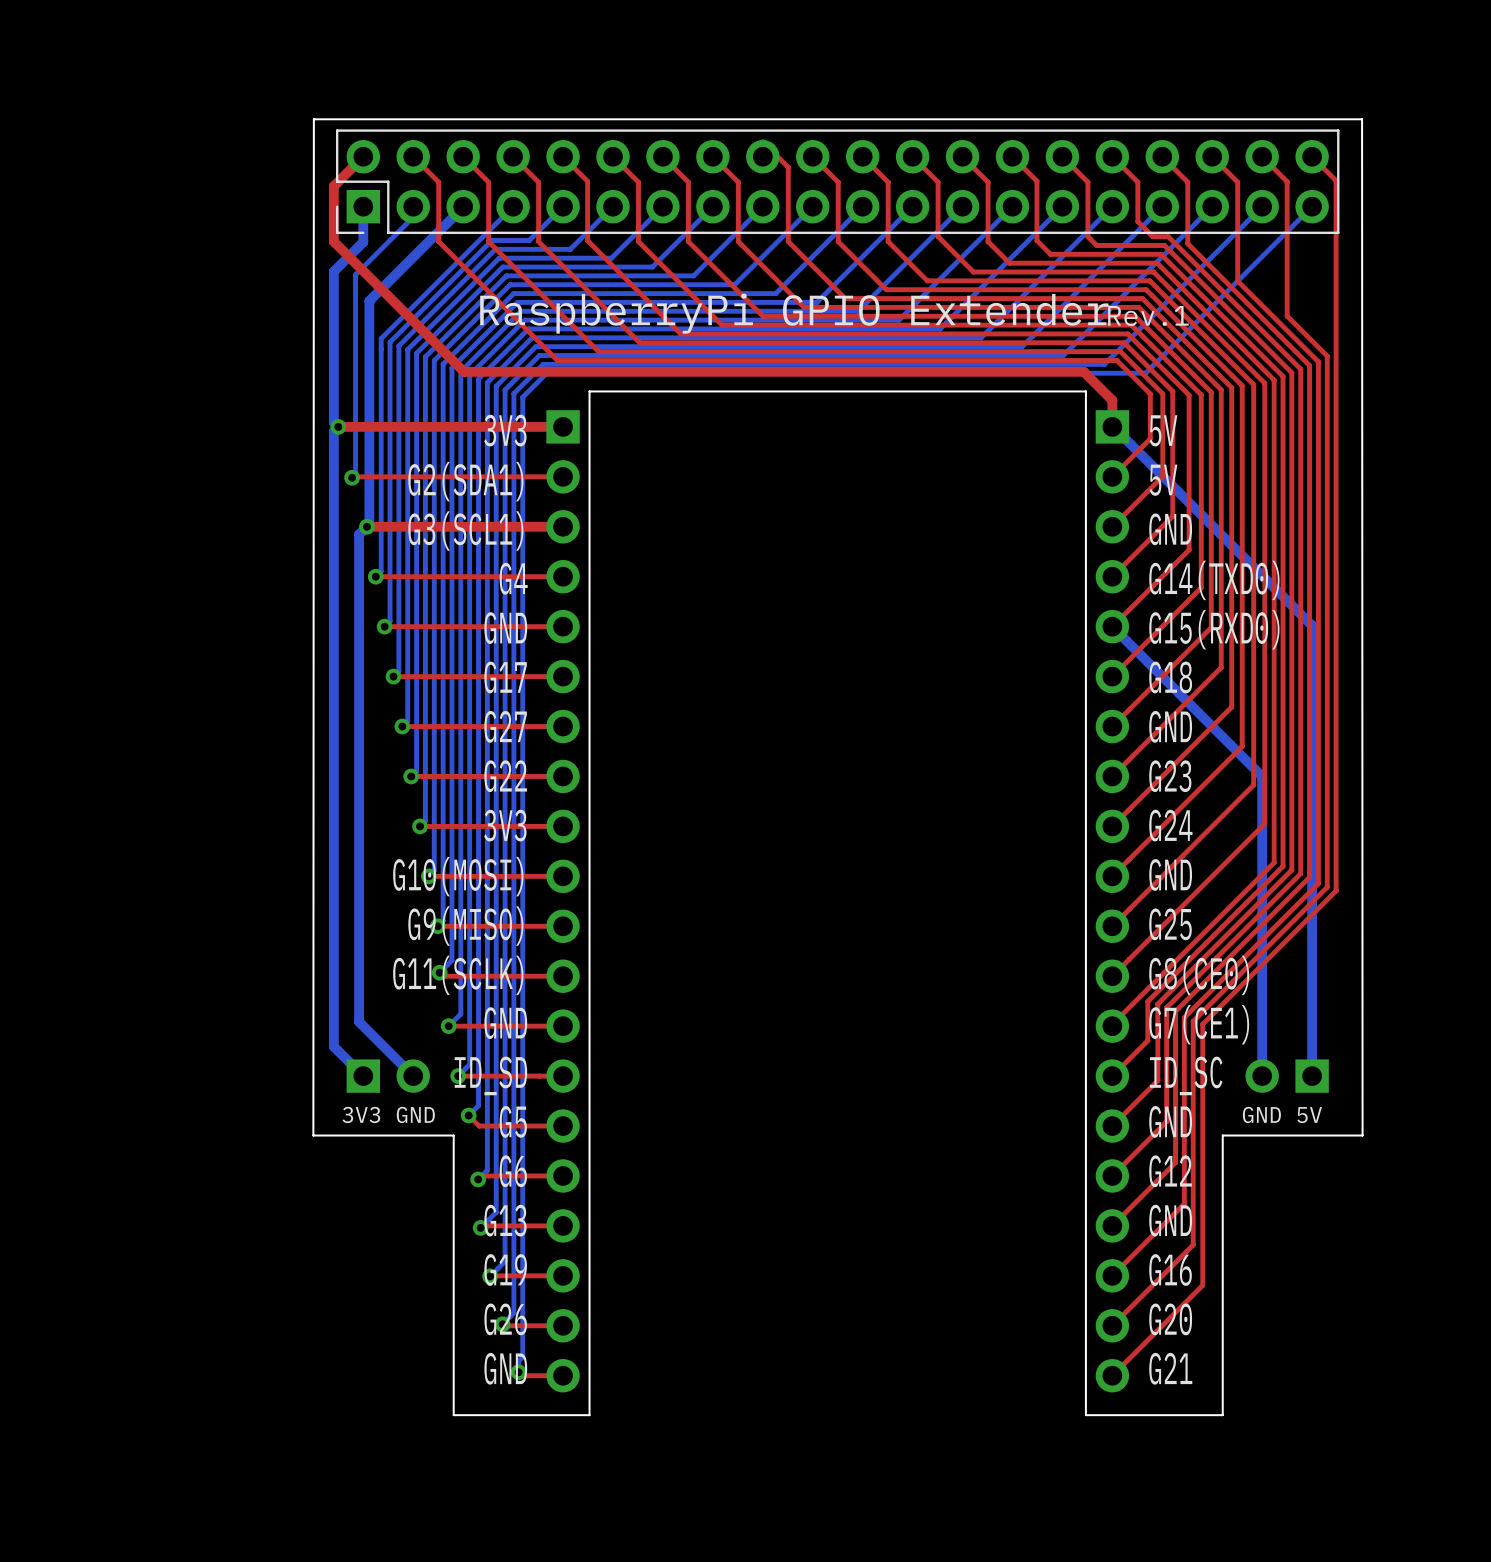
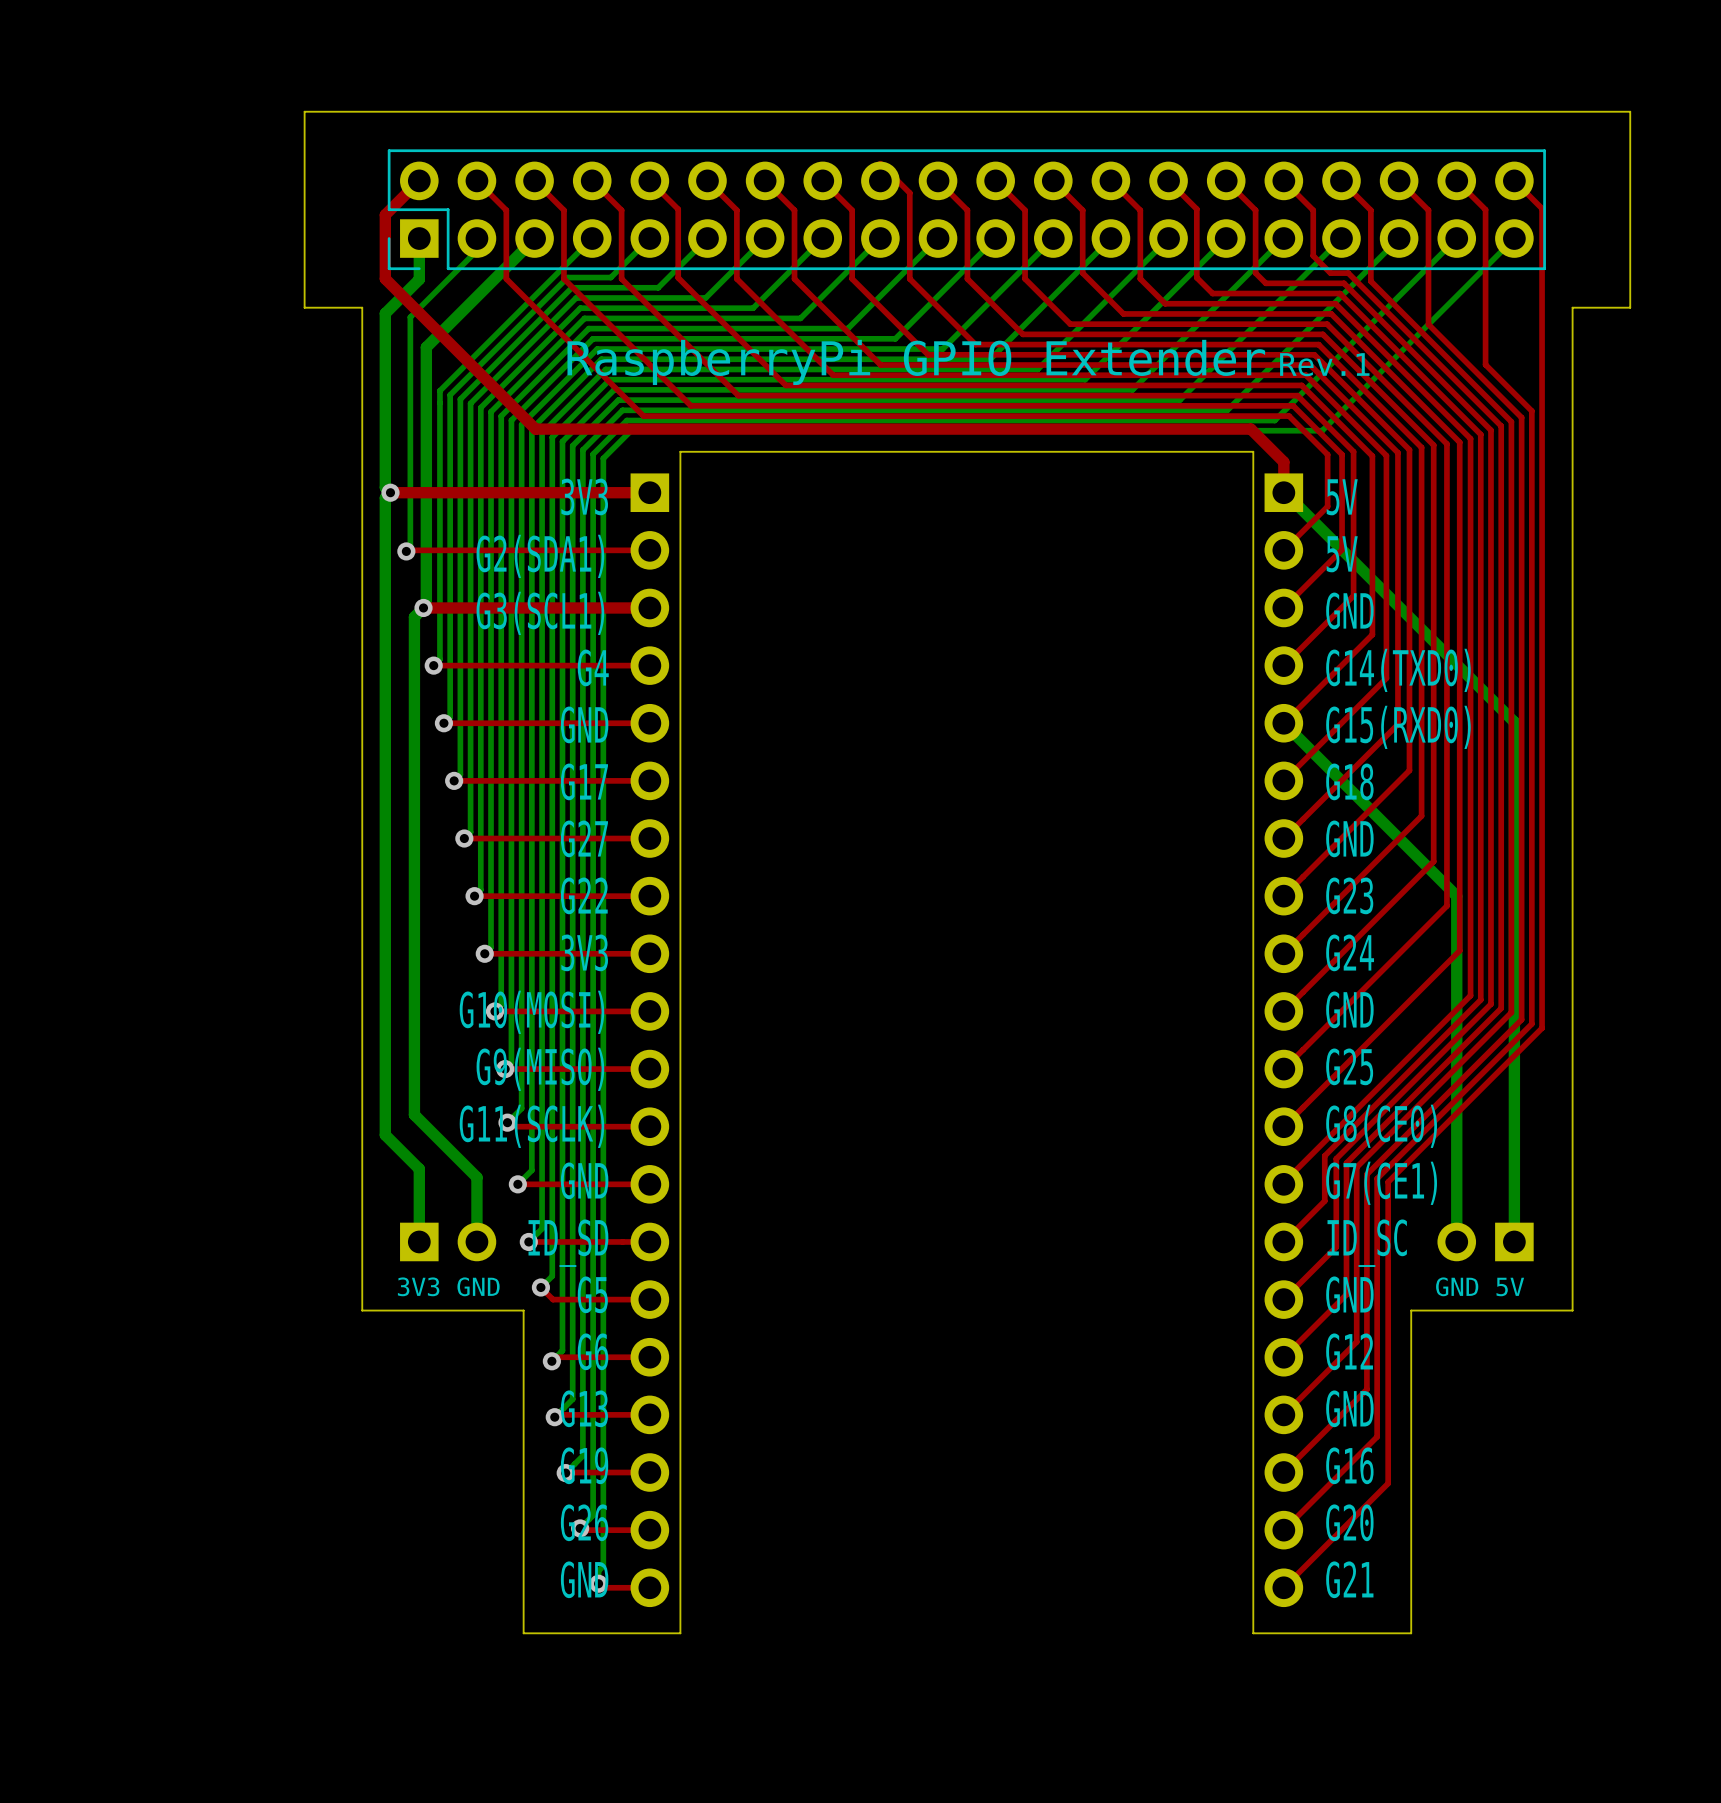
bottom track: (359, 966) (359, 1021) (413, 1076) -> (414, 1114) (476, 1177) (476, 1241)
bottom track: (333, 983) (333, 1046) (363, 1076) -> (385, 1135) (419, 1169) (419, 1241)
board edge: (313, 1135) (313, 119) (1362, 119) (1362, 1135) -> (362, 1310) (362, 307) (304, 307) (304, 111) (1630, 111) (1630, 307) (1572, 307) (1572, 1310)

